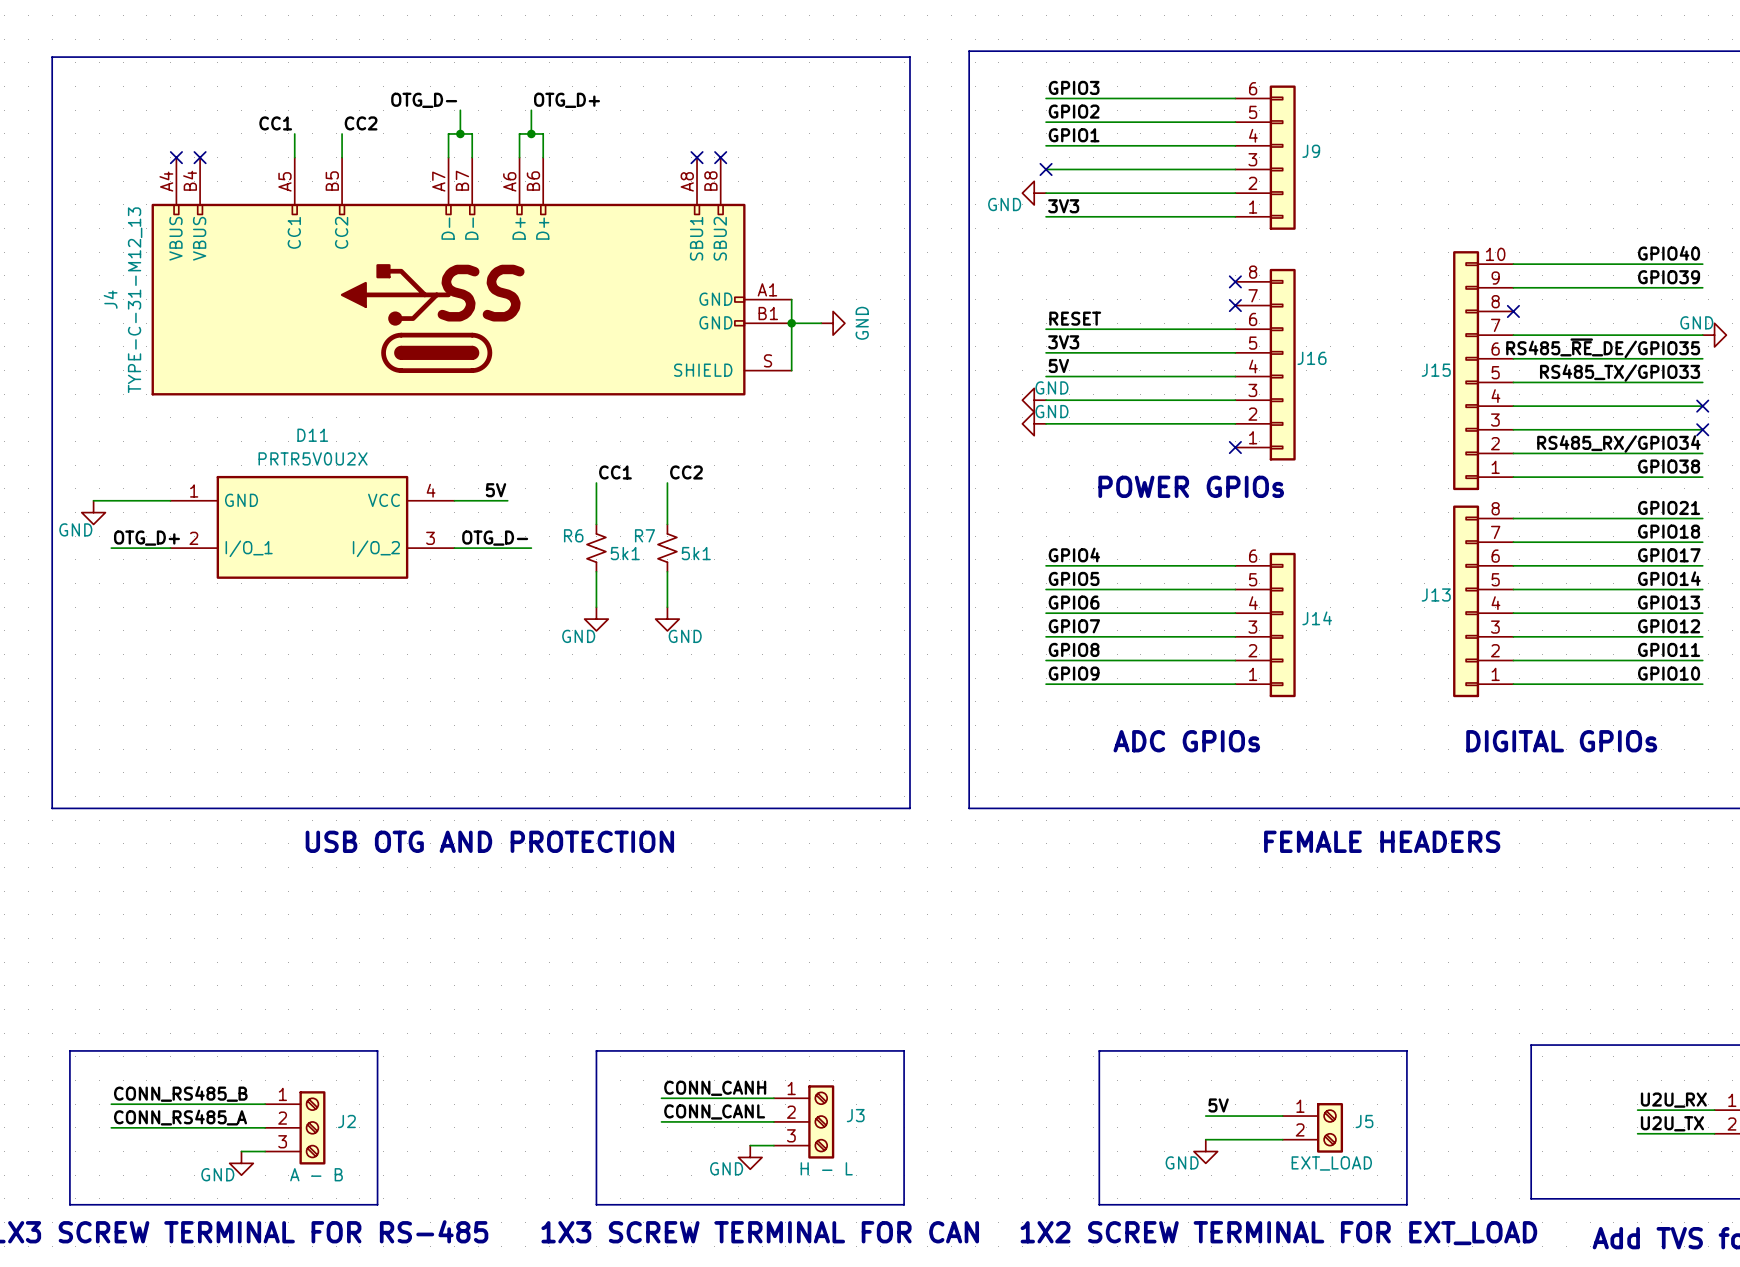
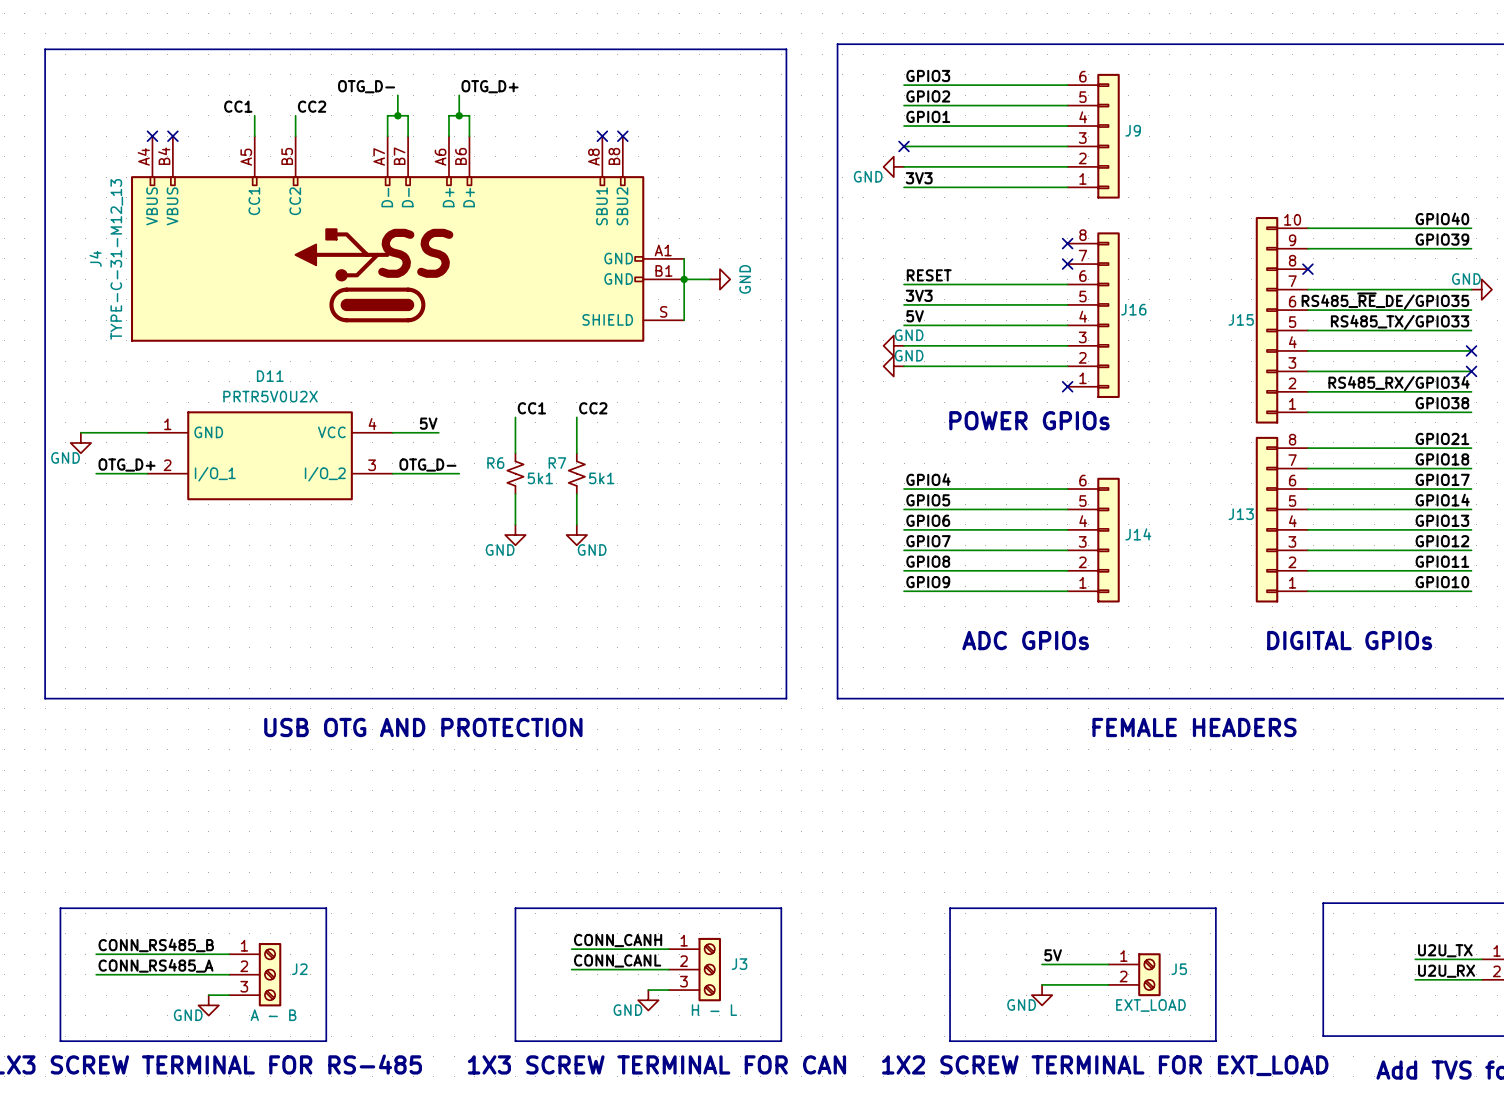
label: U2U_RX (1673, 1100) -> U2U_TX (1445, 950)
label: U2U_TX (1672, 1123) -> U2U_RX (1446, 971)

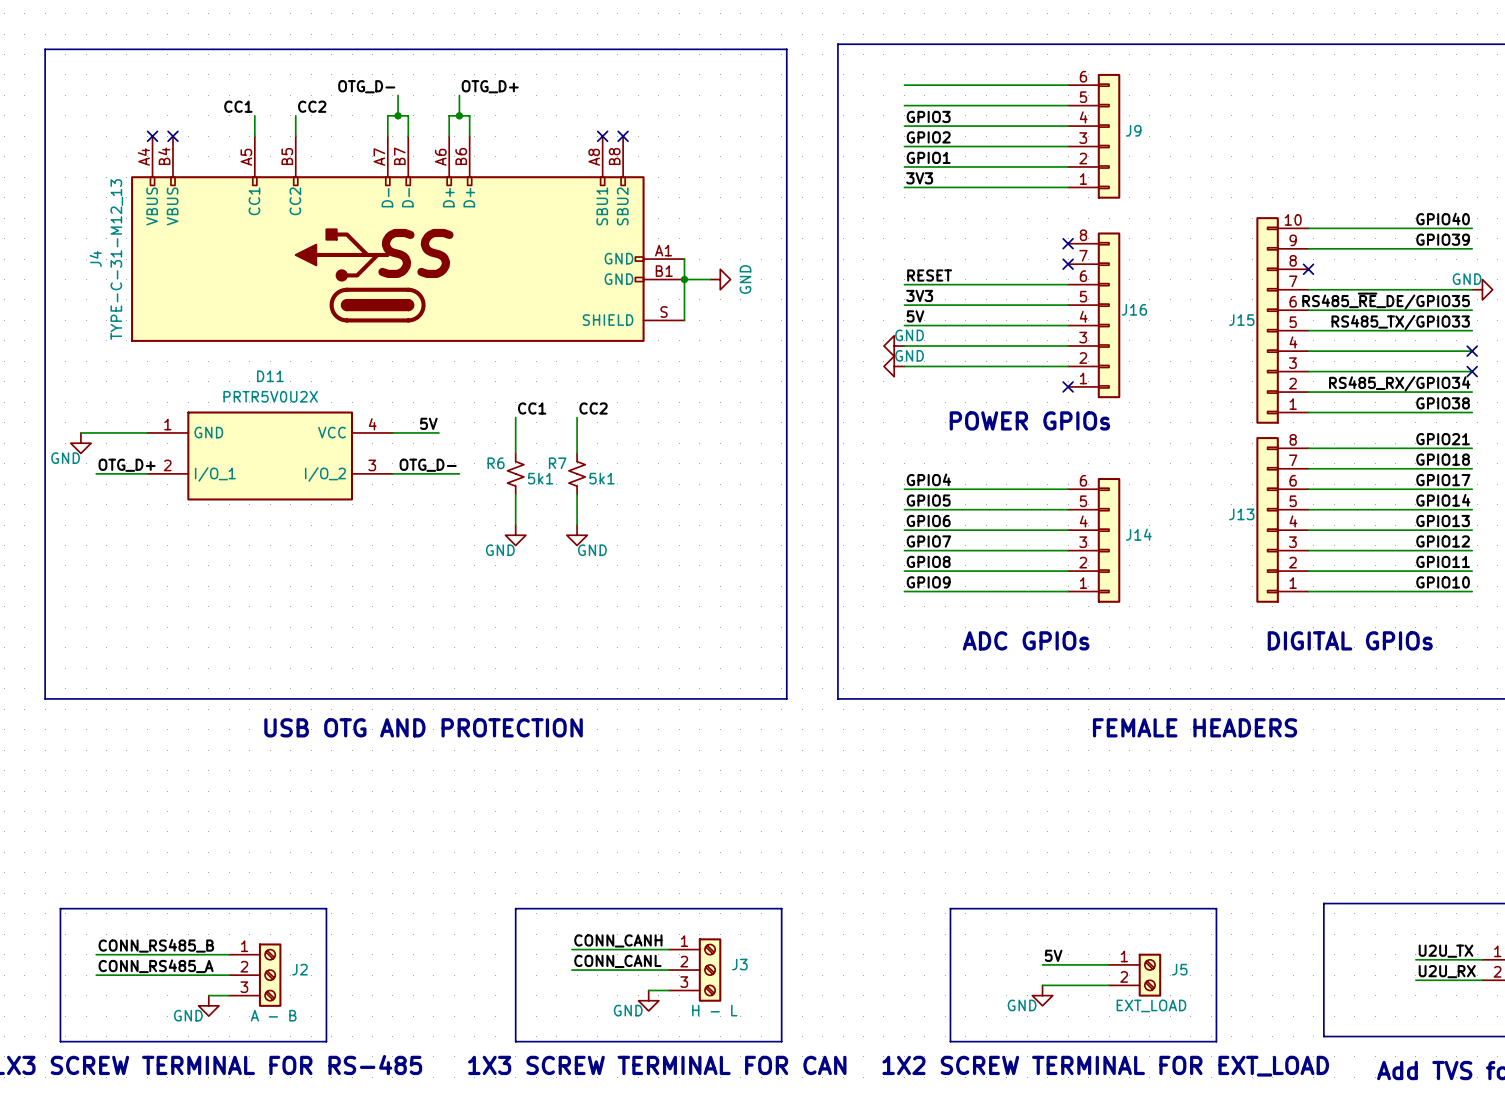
label: GPIO3 (928, 75) -> none
label position: GPIO2 (928, 96) -> GPIO2 (928, 137)
label: GPIO1 (928, 116) -> GPIO3 (928, 116)
no-connect mark: (904, 146) -> none
label: none -> GPIO1 (928, 157)
power symbol: GND (893, 166) -> none

